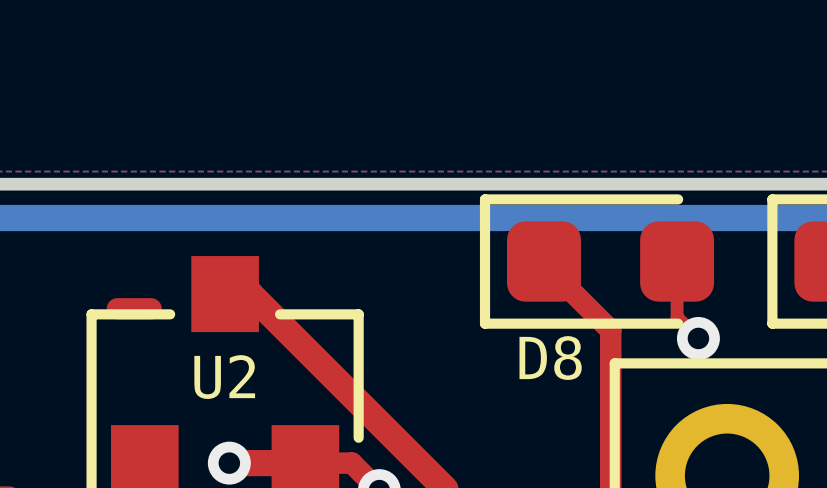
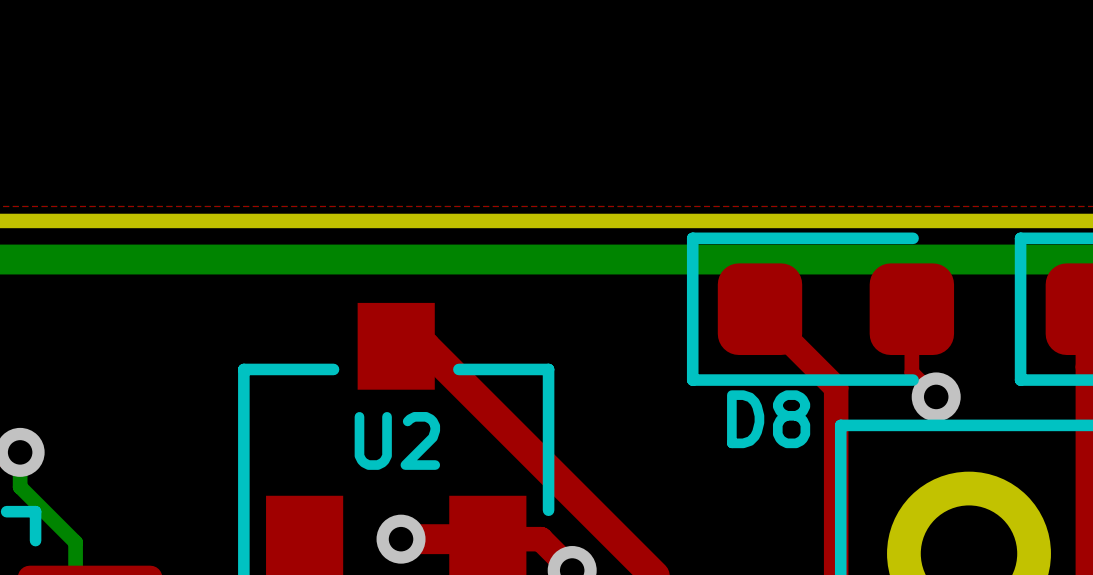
top track: (117, 308) (151, 308) -> none

